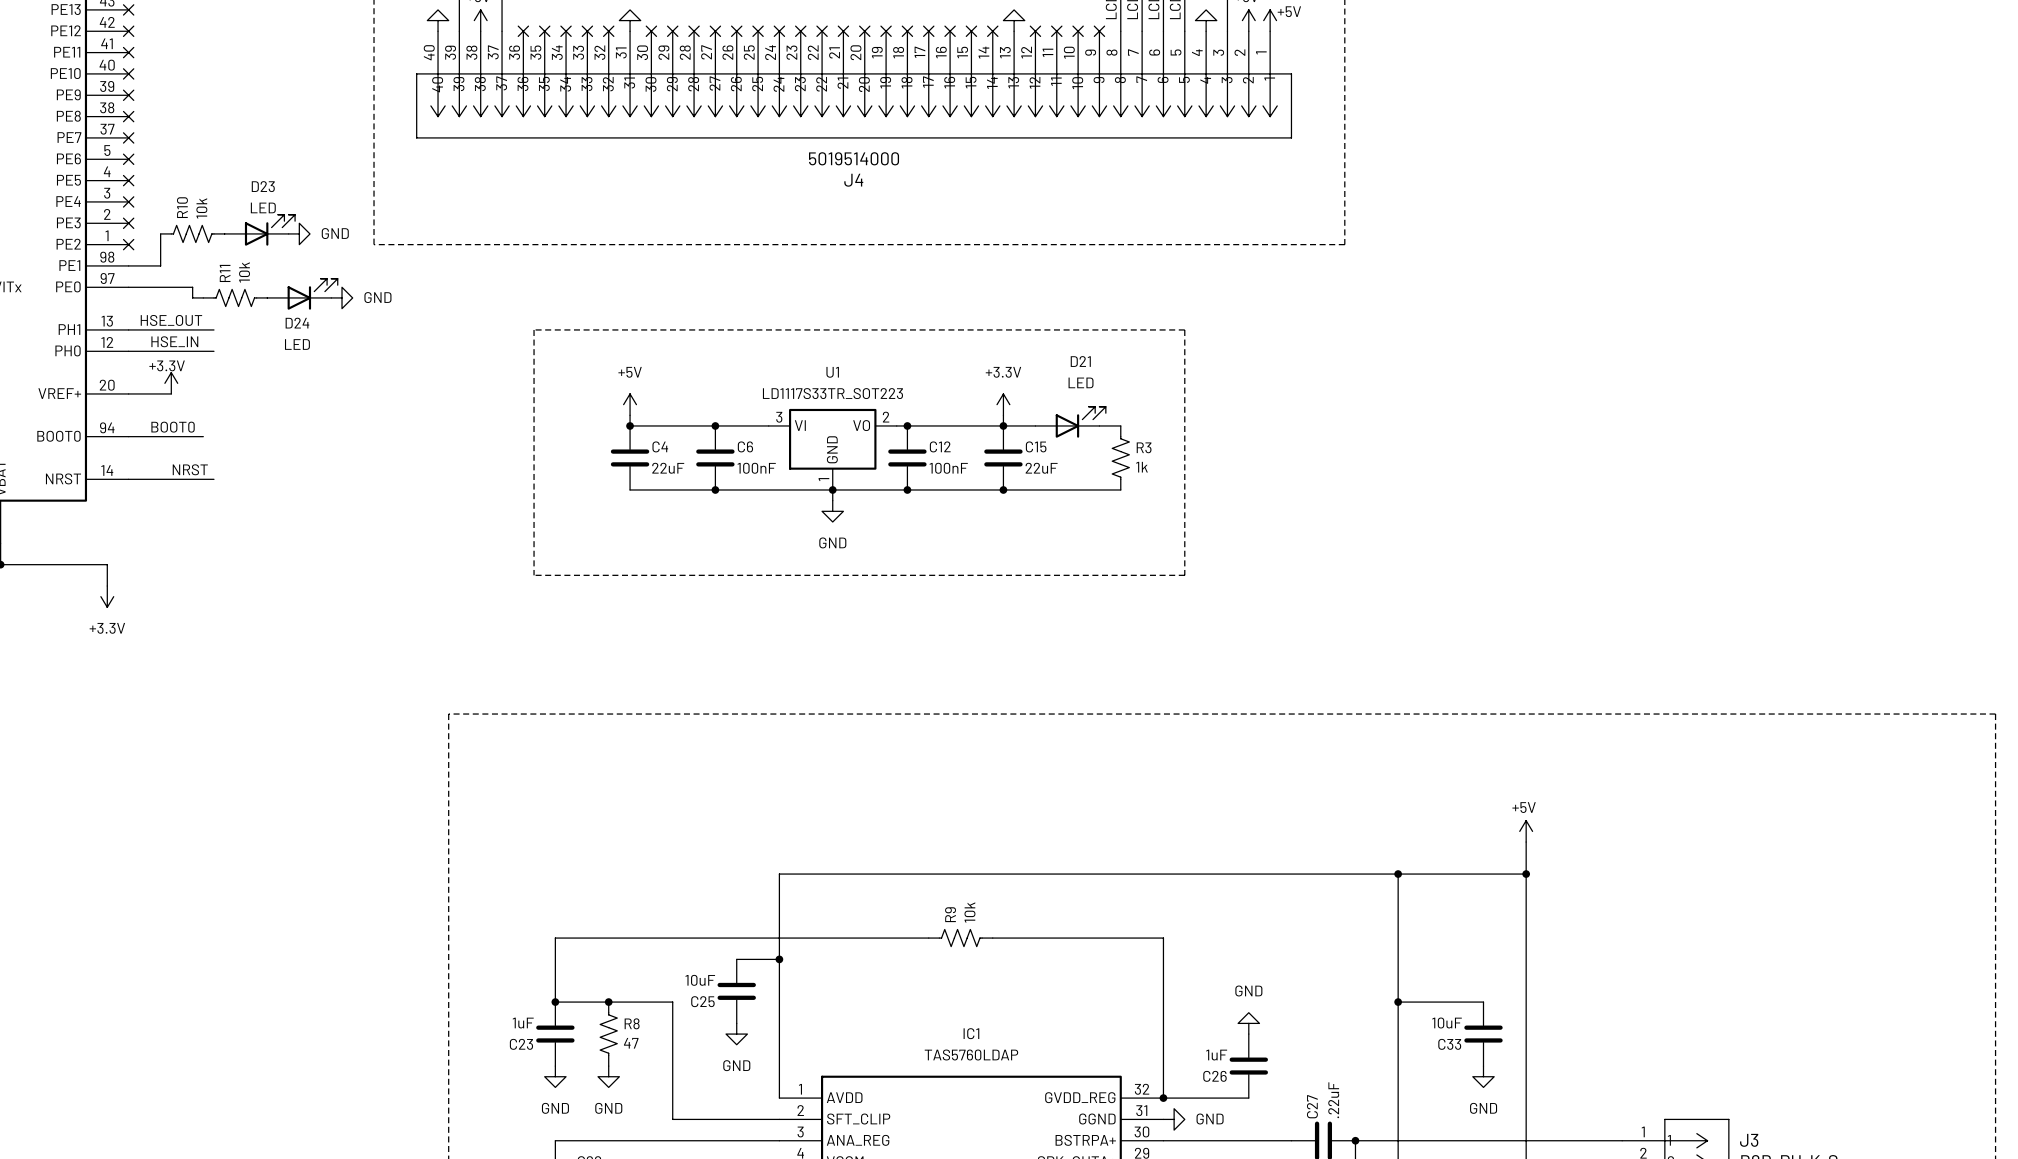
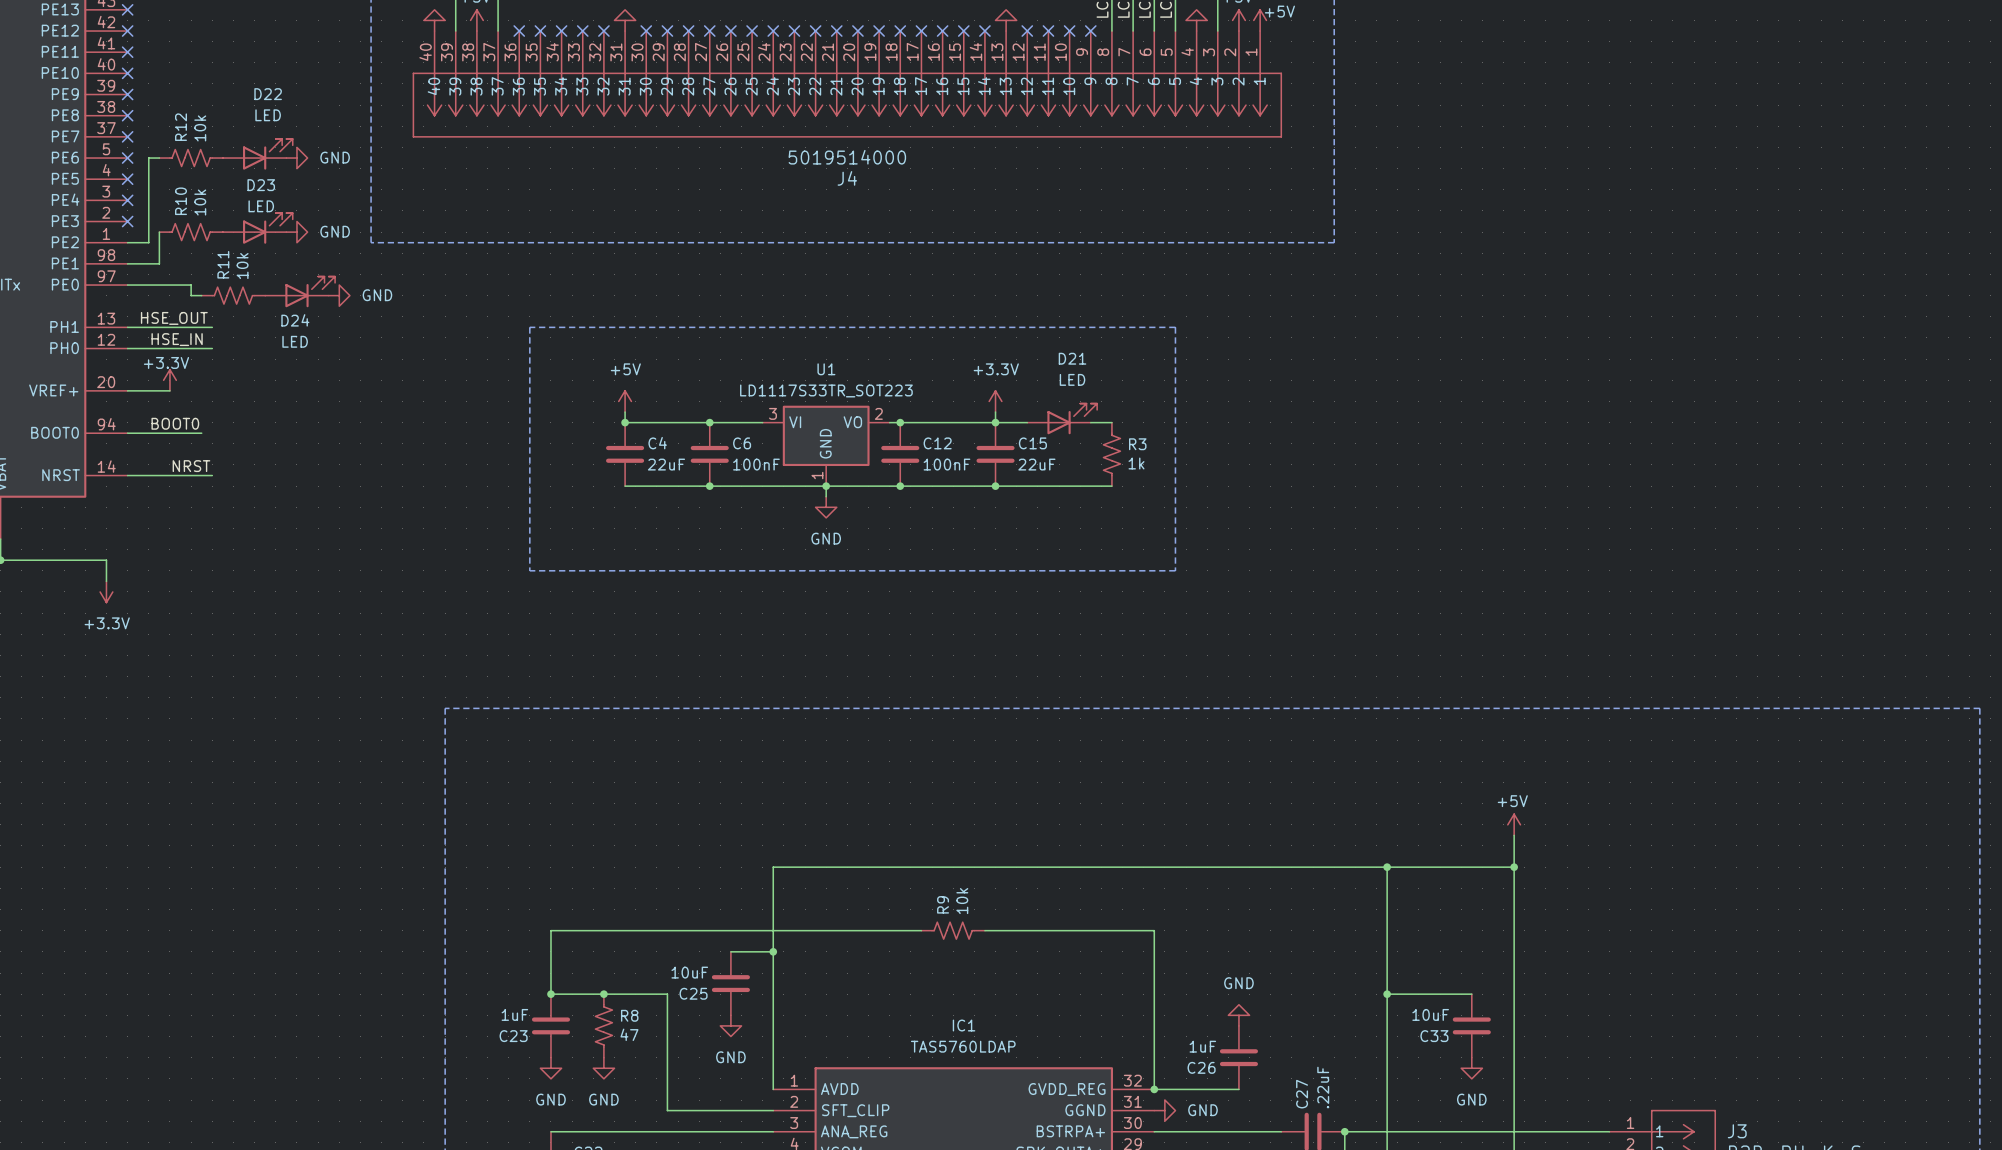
D22: none -> LED (257, 154)
wire: none -> (159, 158) (148, 158) (148, 242) (127, 242)
R12: none -> 10k (191, 158)
power symbol: none -> GND (296, 158)
no-connect mark: (128, 244) -> none

